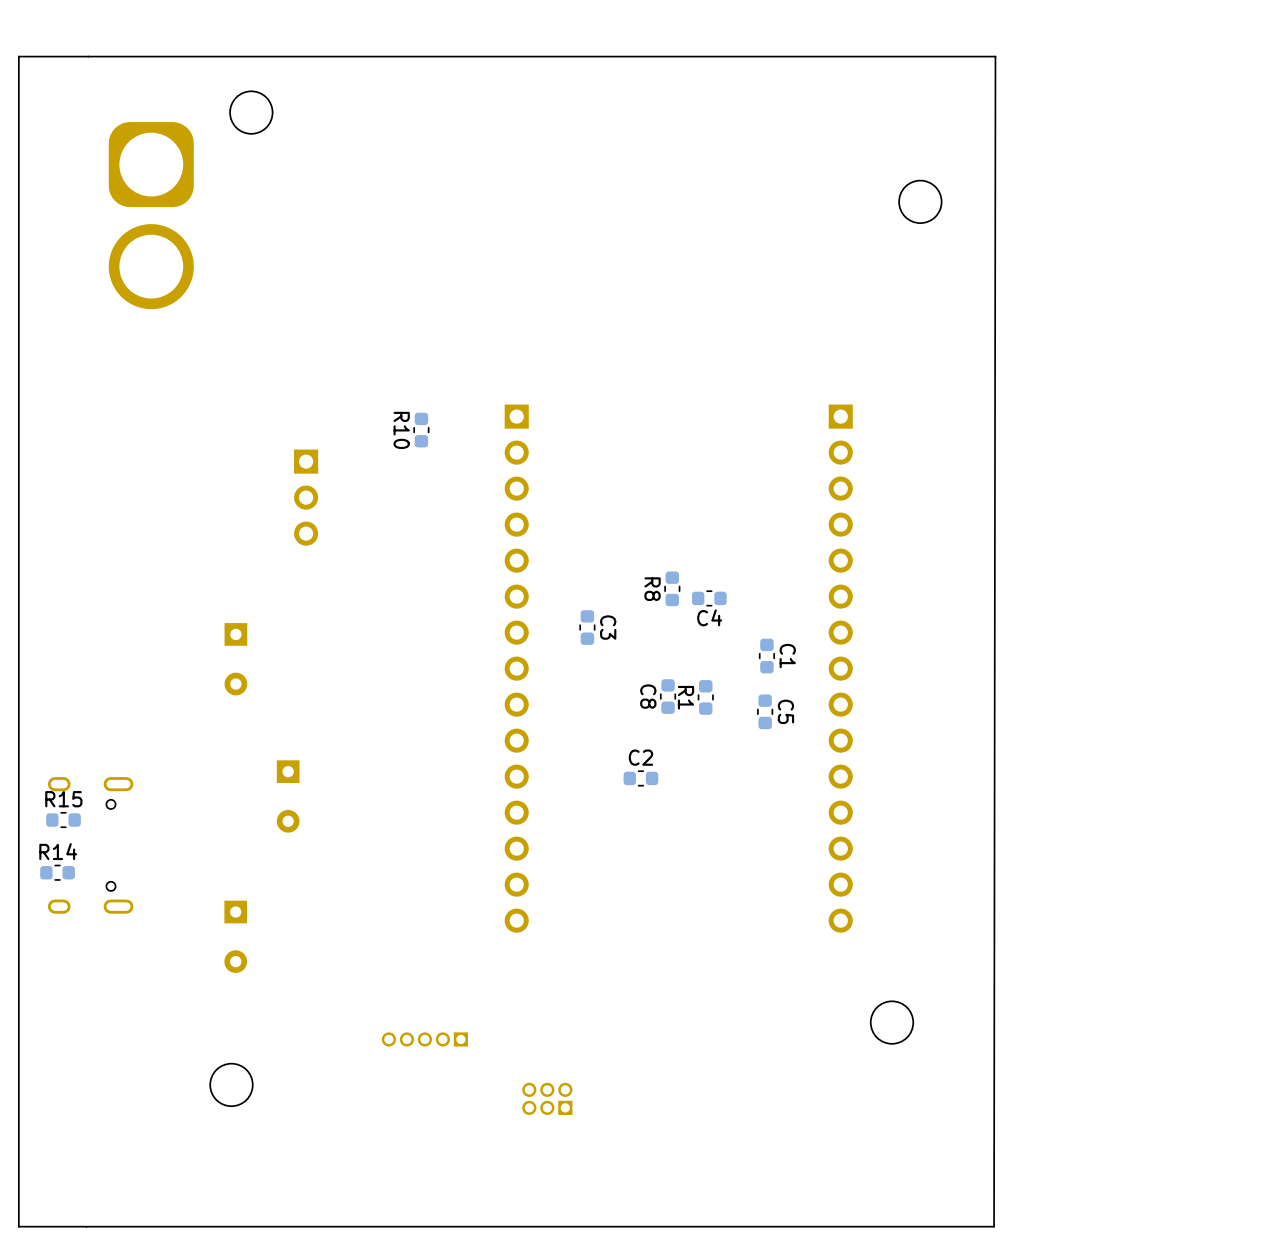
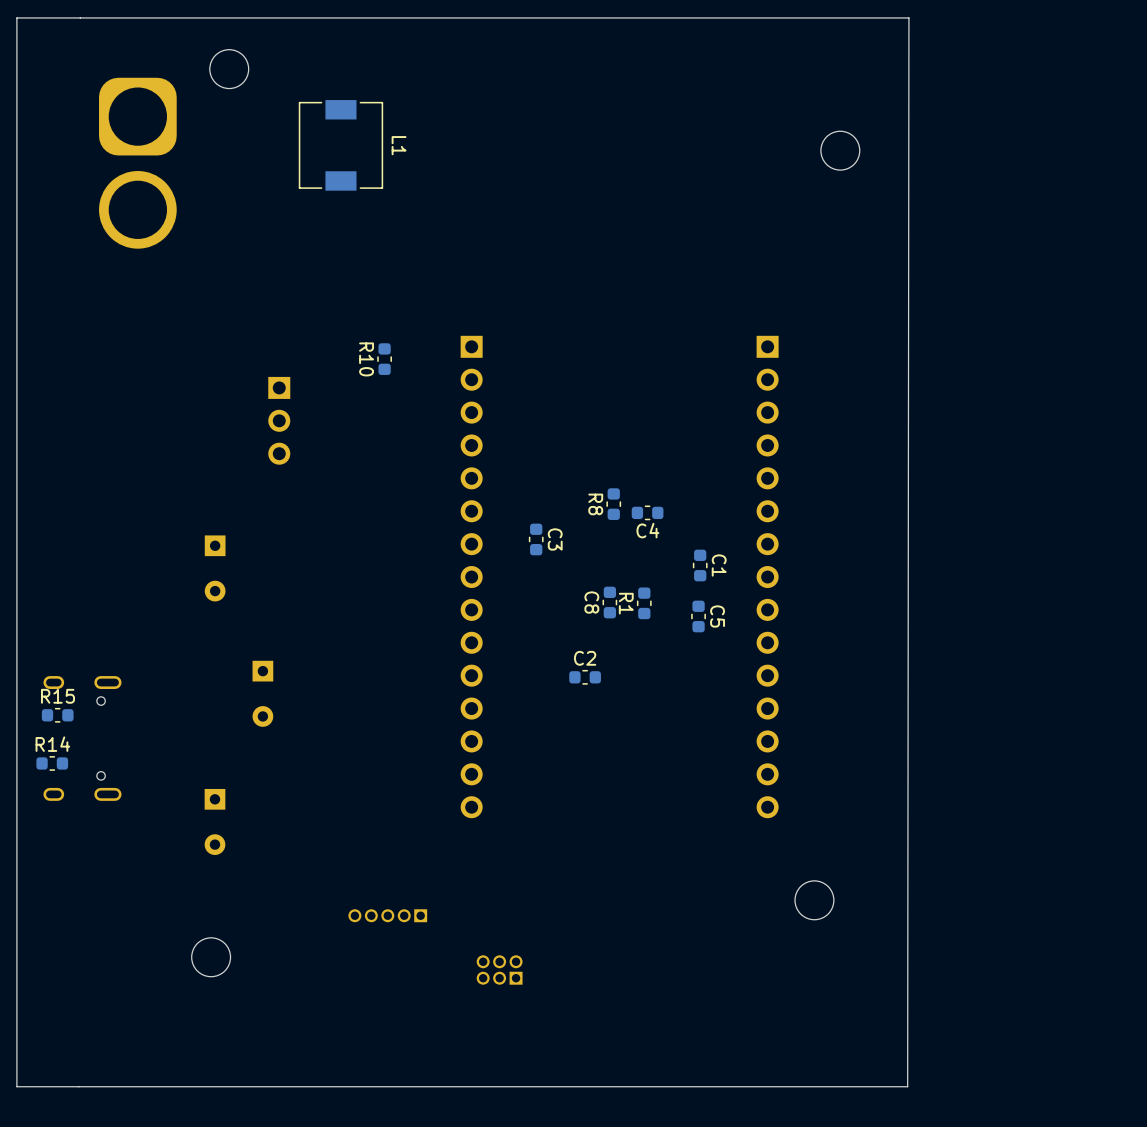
L1: none -> (340, 145)

